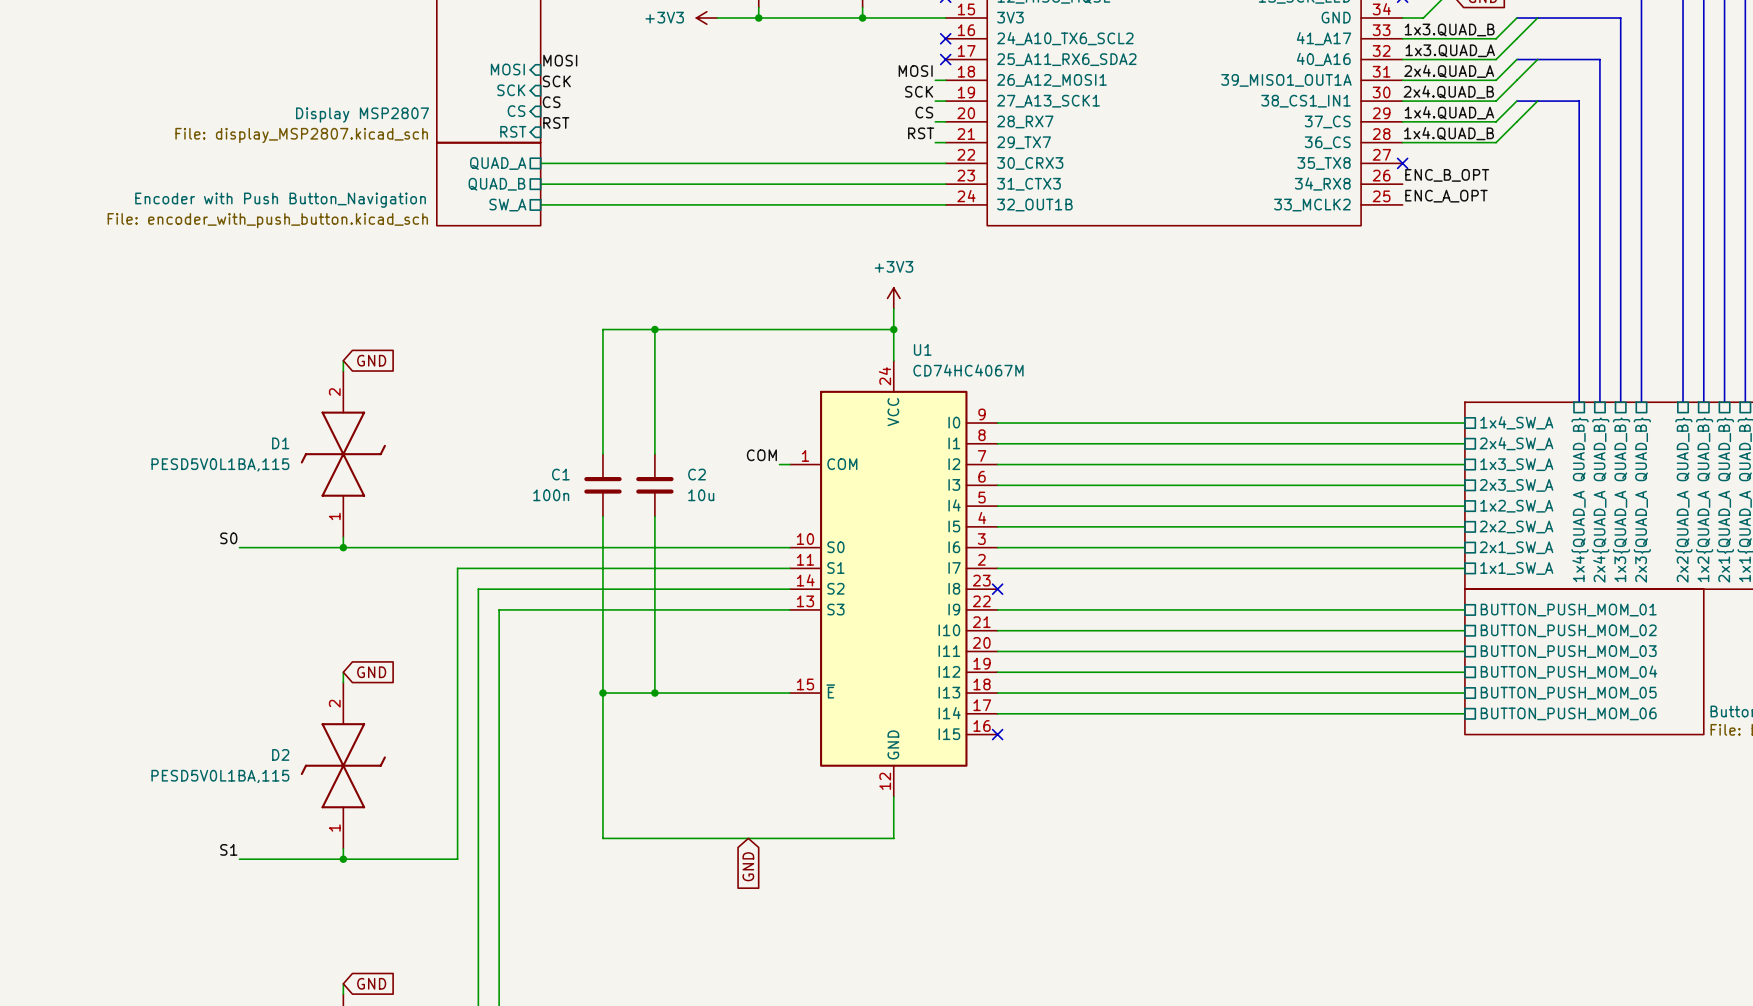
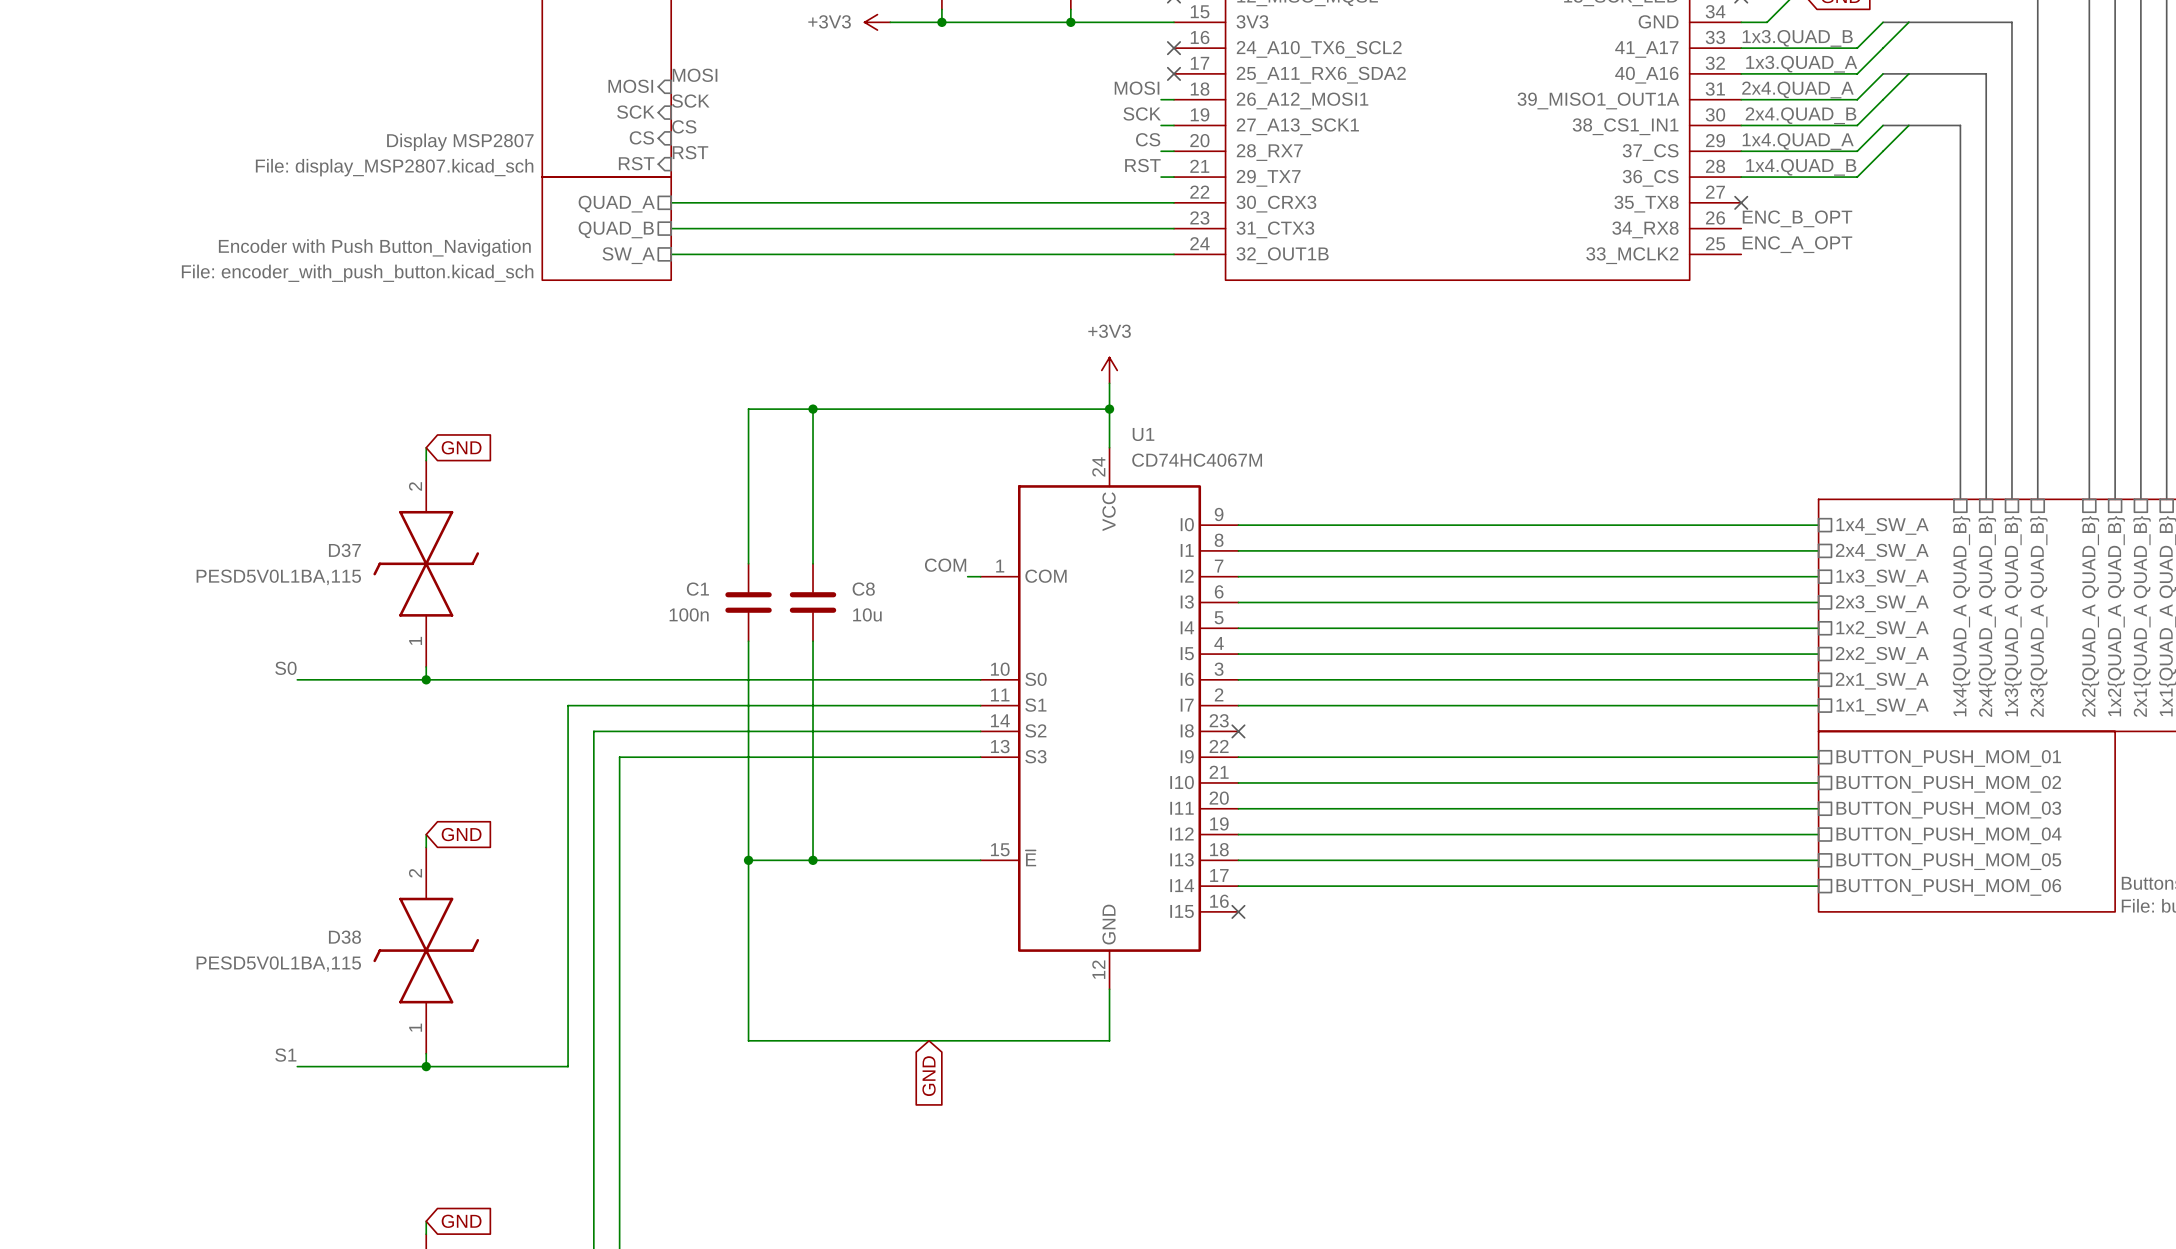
D1 name: D1 (280, 443) -> D37 (344, 550)
C2 name: C2 (697, 474) -> C8 (863, 589)
D2 name: D2 (280, 754) -> D38 (344, 937)

